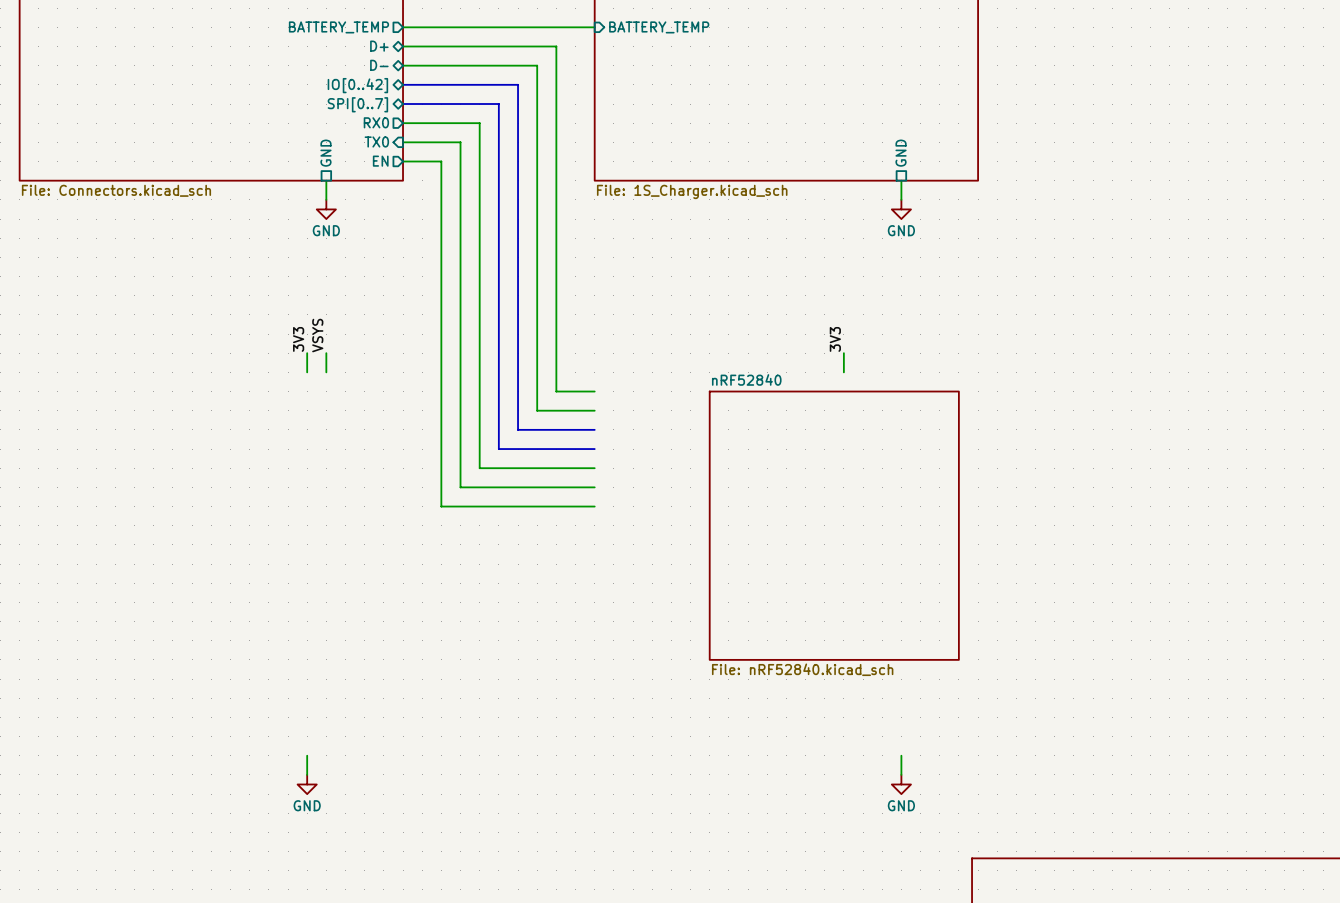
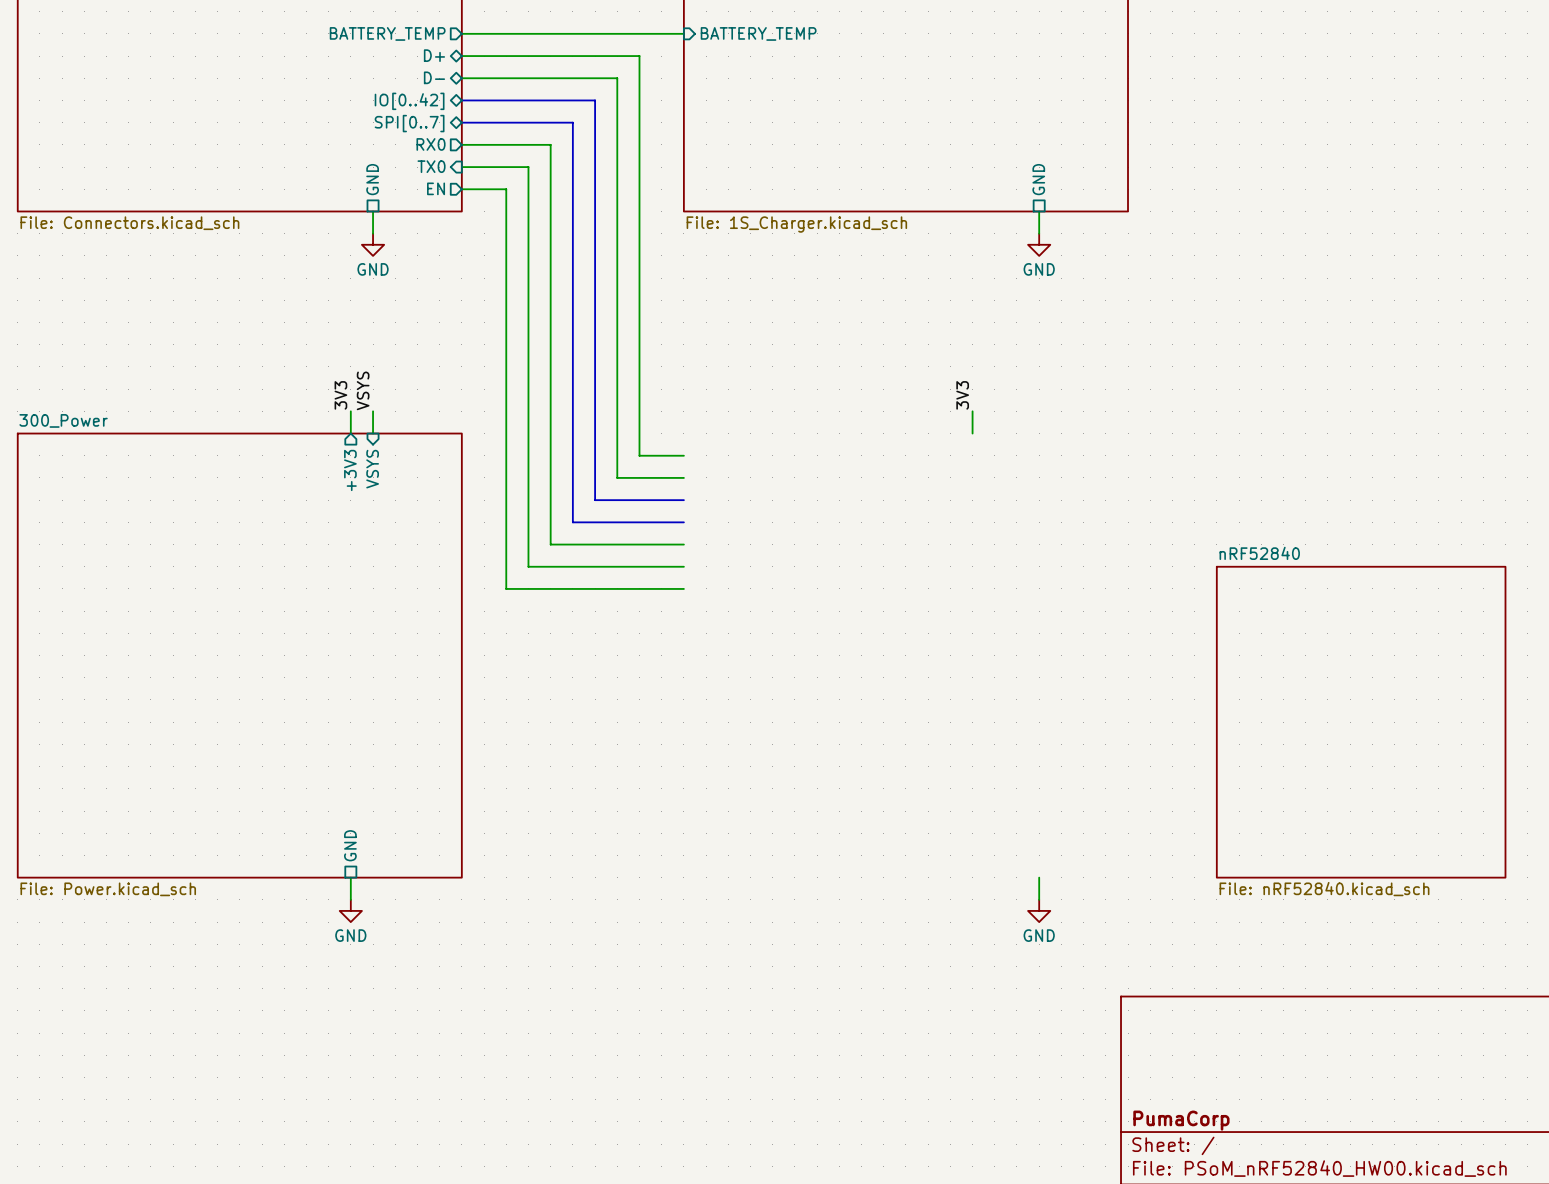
sheet pin: none -> VSYS (372, 469)
sheet pin: none -> +3V3 (350, 470)
sheet nRF52840 position: (834, 525) -> (1361, 722)
sheet 300_Power: none -> File: Power.kicad_sch (239, 655)
sheet pin: none -> GND (350, 845)

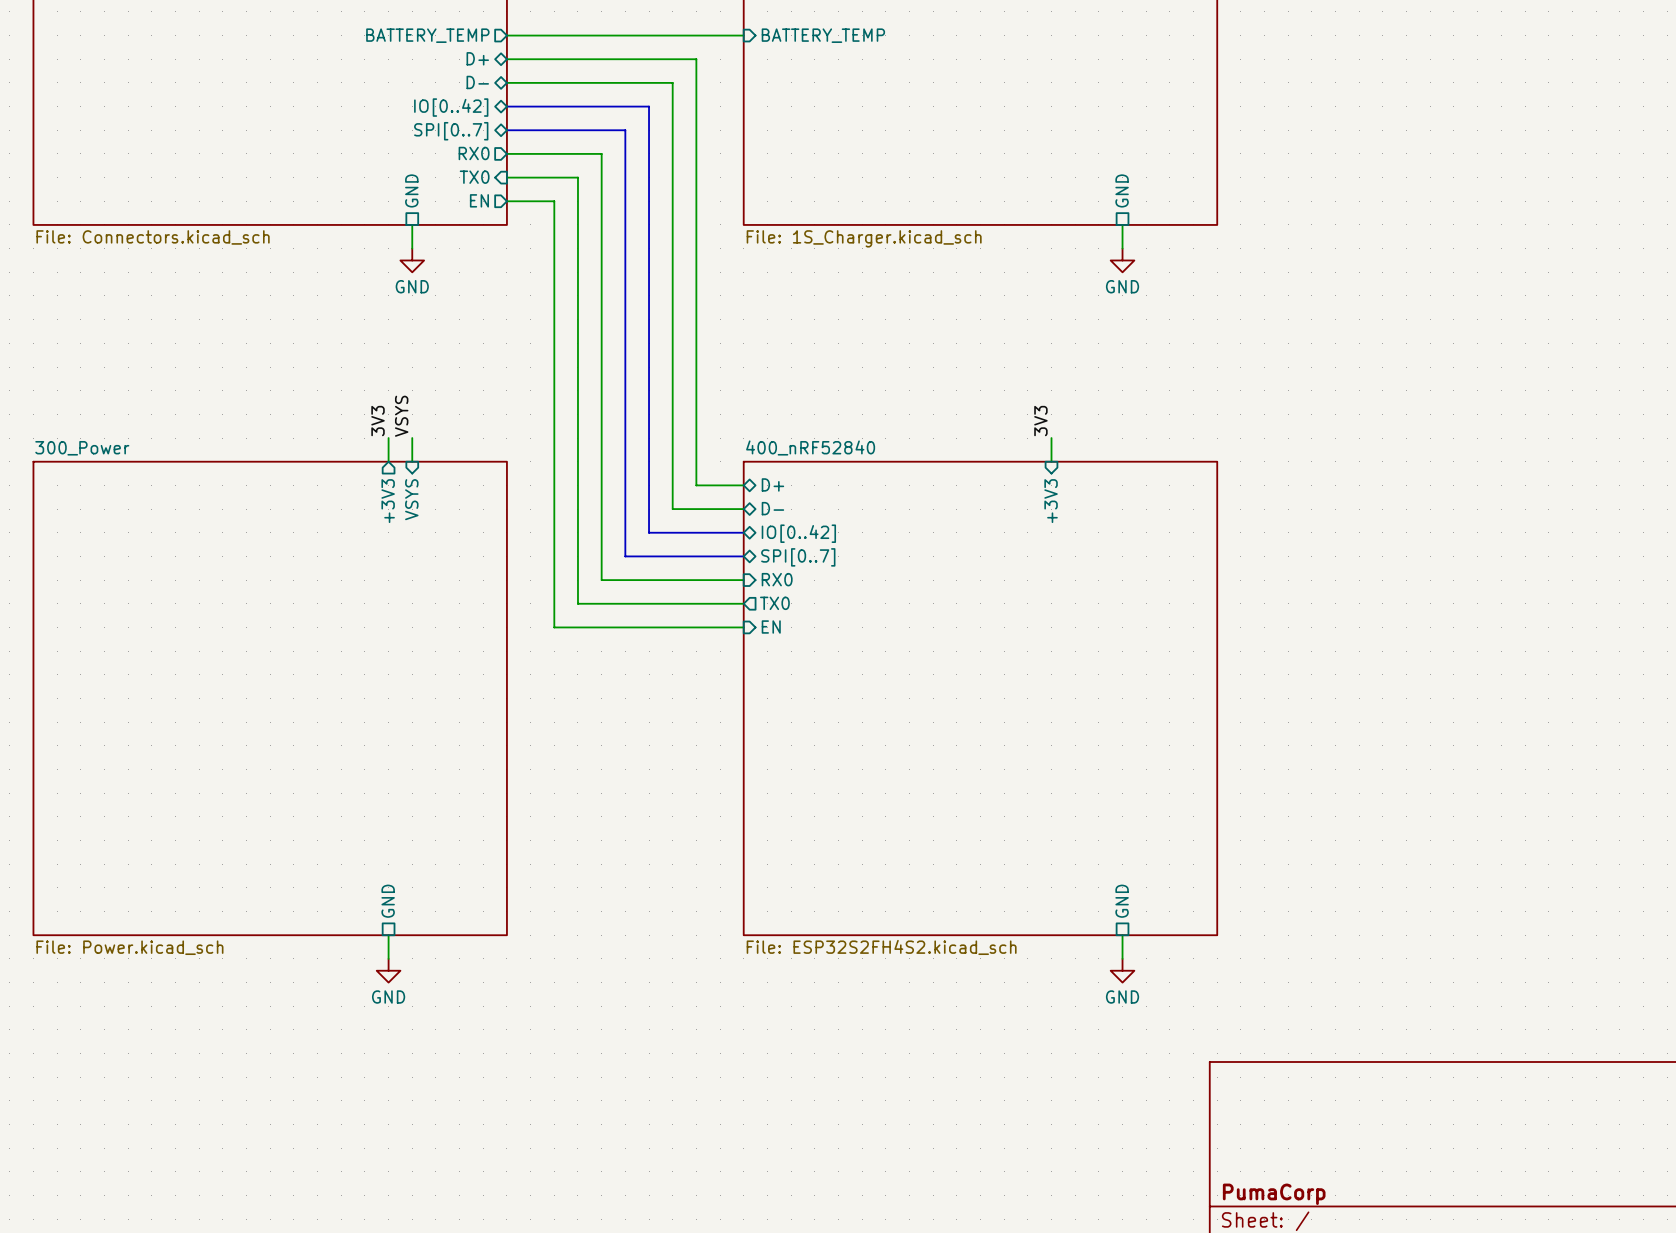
sheet pin: none -> D+ (772, 484)
sheet pin: none -> +3V3 (1051, 501)
sheet pin: none -> D- (772, 508)
sheet pin: none -> IO[0..42] (798, 533)
sheet pin: none -> SPI[0..7] (798, 557)
sheet pin: none -> RX0 (777, 579)
sheet pin: none -> TX0 (774, 603)
sheet pin: none -> EN (771, 627)
sheet 400_nRF52840: none -> File: ESP32S2FH4S2.kicad_sch (980, 698)
sheet nRF52840: File: nRF52840.kicad_sch (1361, 722) -> none
sheet pin: none -> GND (1122, 901)

